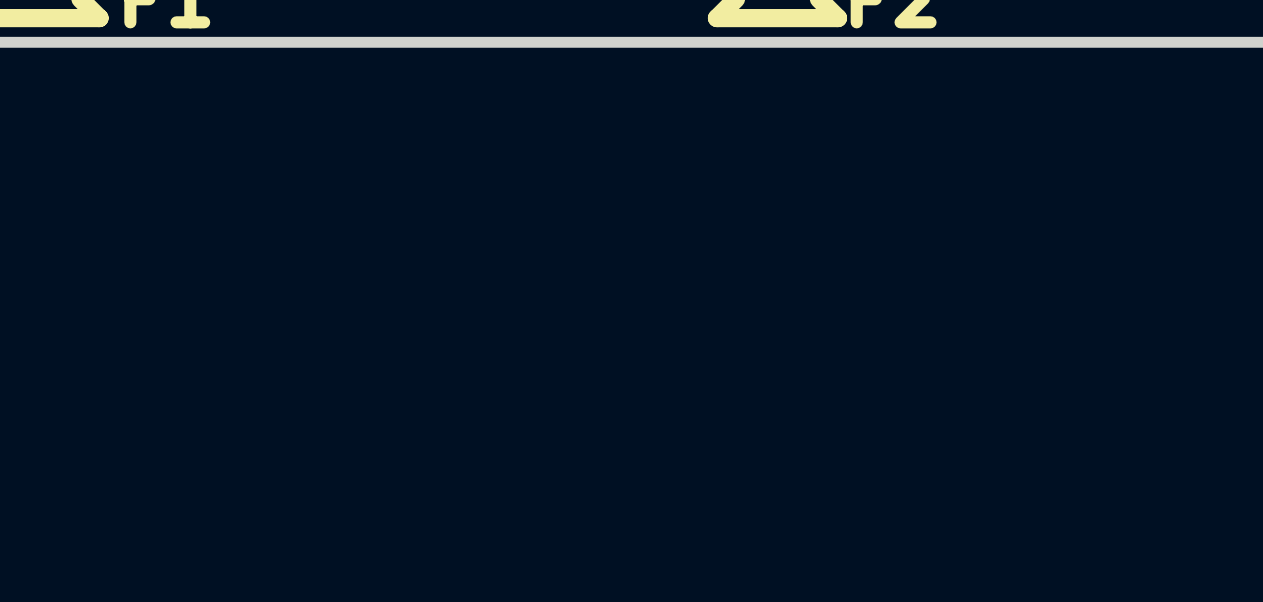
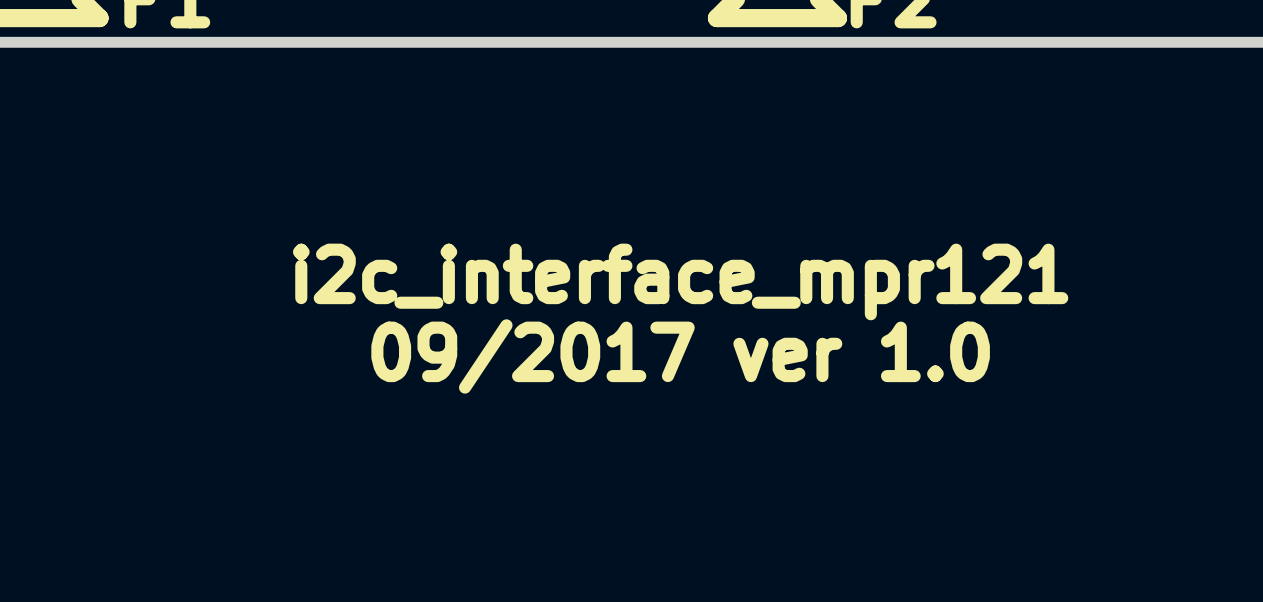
text: none -> i2c_interface_mpr121 (680, 281)
text: none -> 09/2017 ver 1.0 (680, 356)

